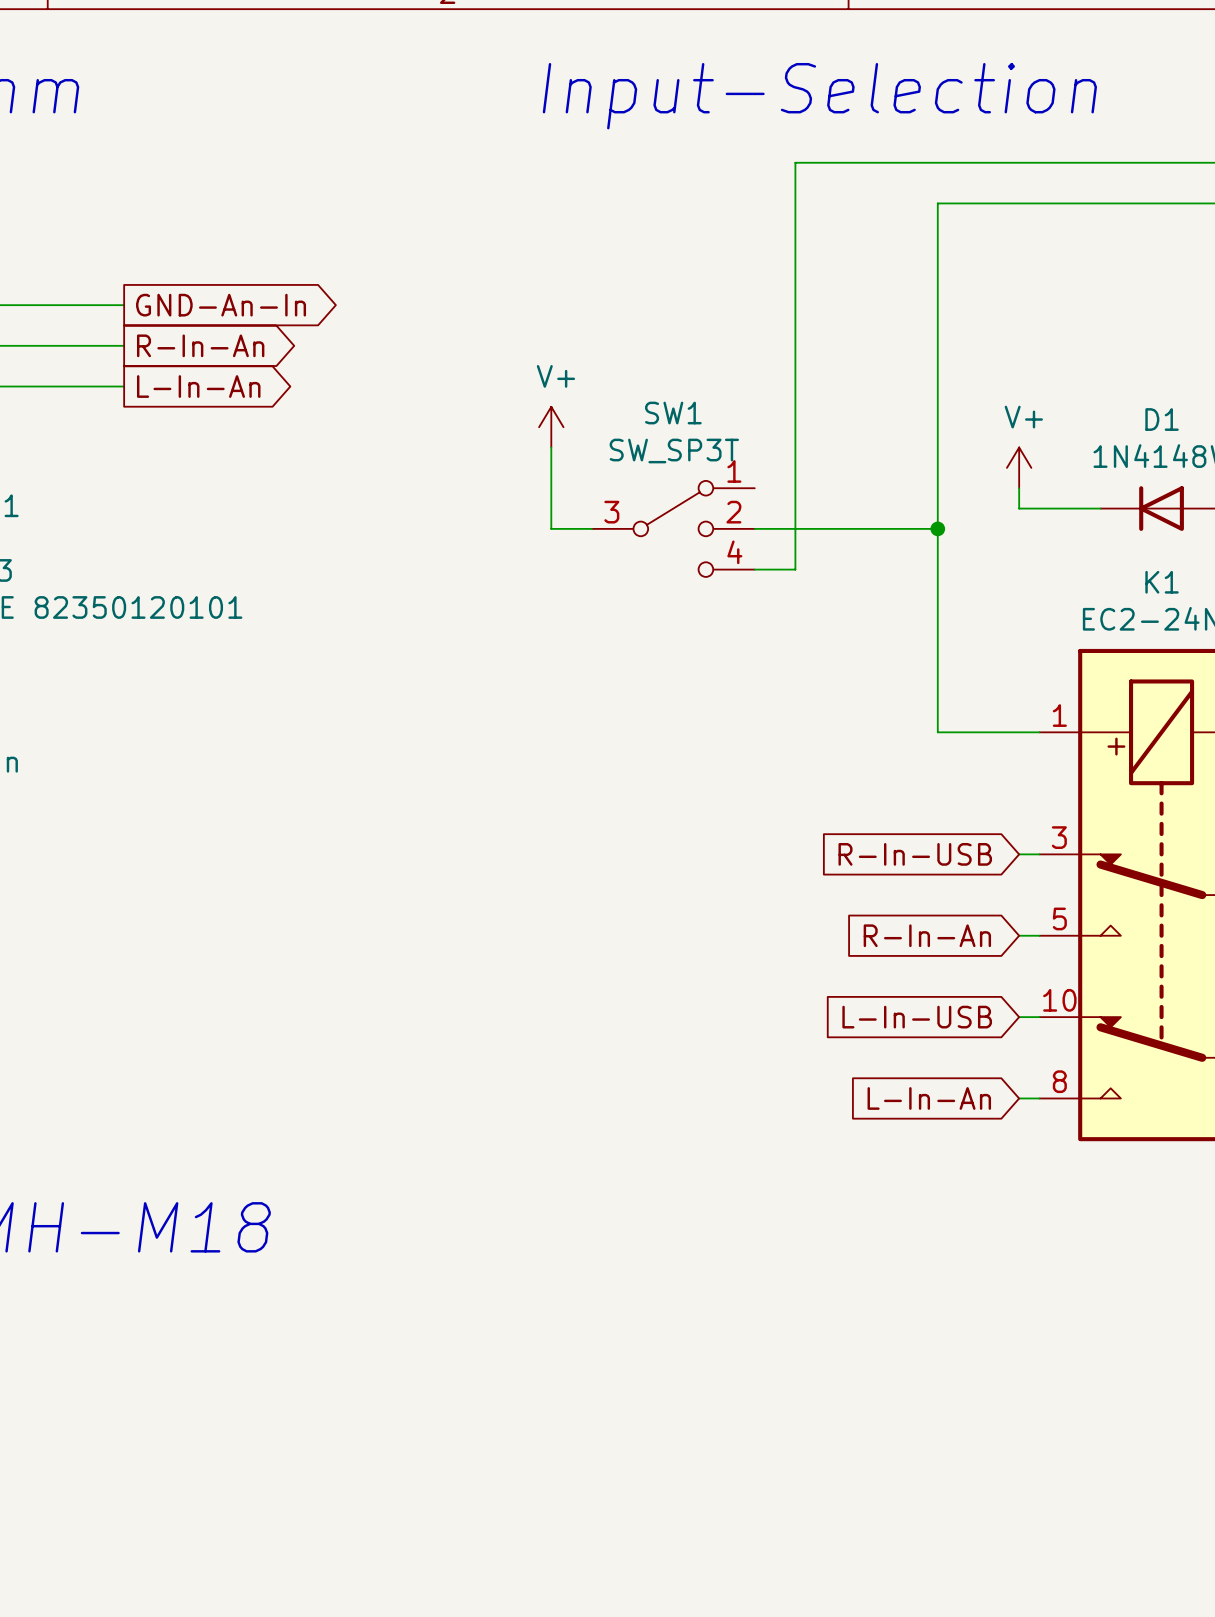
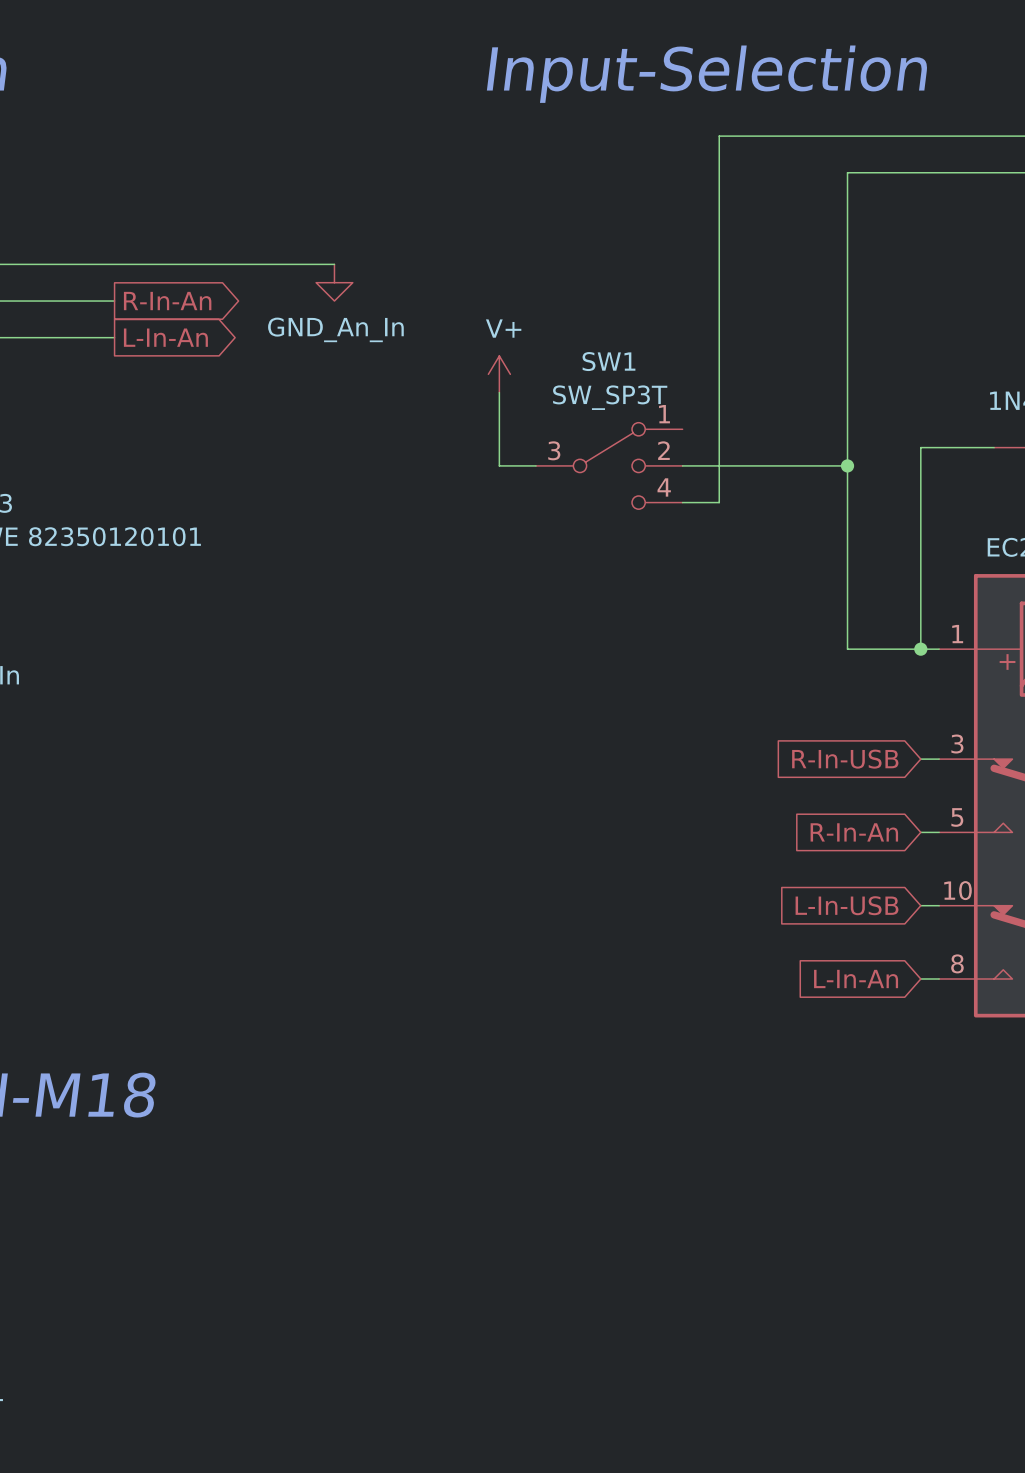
wire: none -> (114, 264) (334, 264)
global label: GND-An-In (221, 305) -> none
power symbol: none -> GND_An_In (334, 282)
power symbol: V+ (1019, 467) -> none
wire: (1019, 488) (1019, 508) -> (920, 649) (920, 447)
junction: none -> (920, 649)

